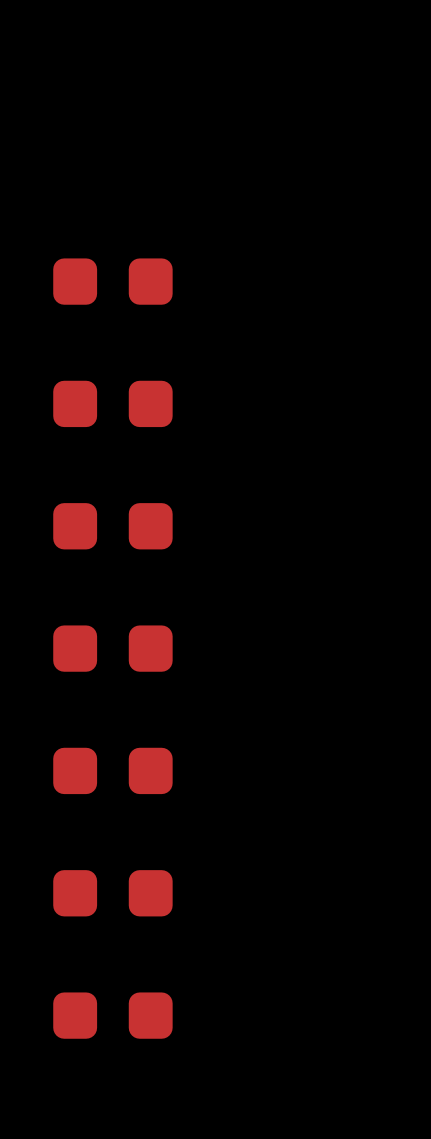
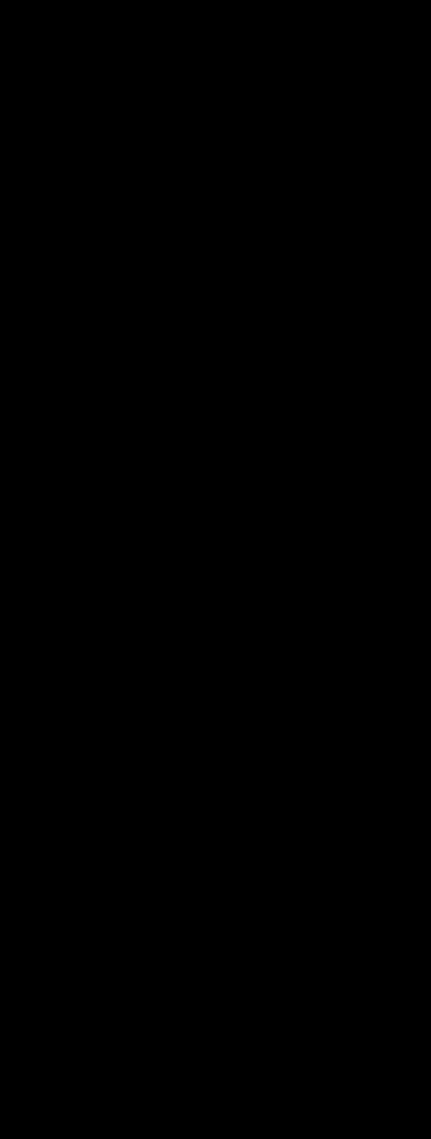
part: (112, 281) -> none
part: (112, 403) -> none
part: (112, 526) -> none
part: (112, 648) -> none
part: (112, 770) -> none
part: (112, 893) -> none
part: (112, 1015) -> none

